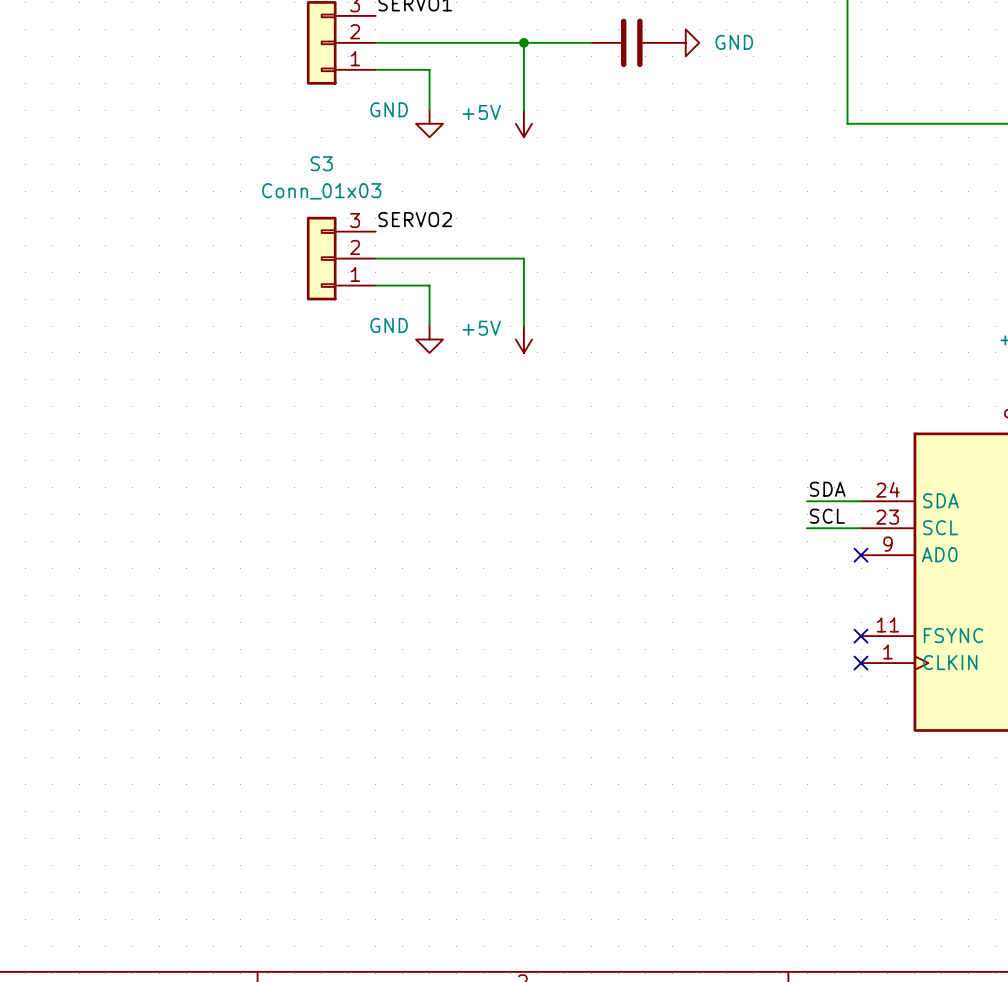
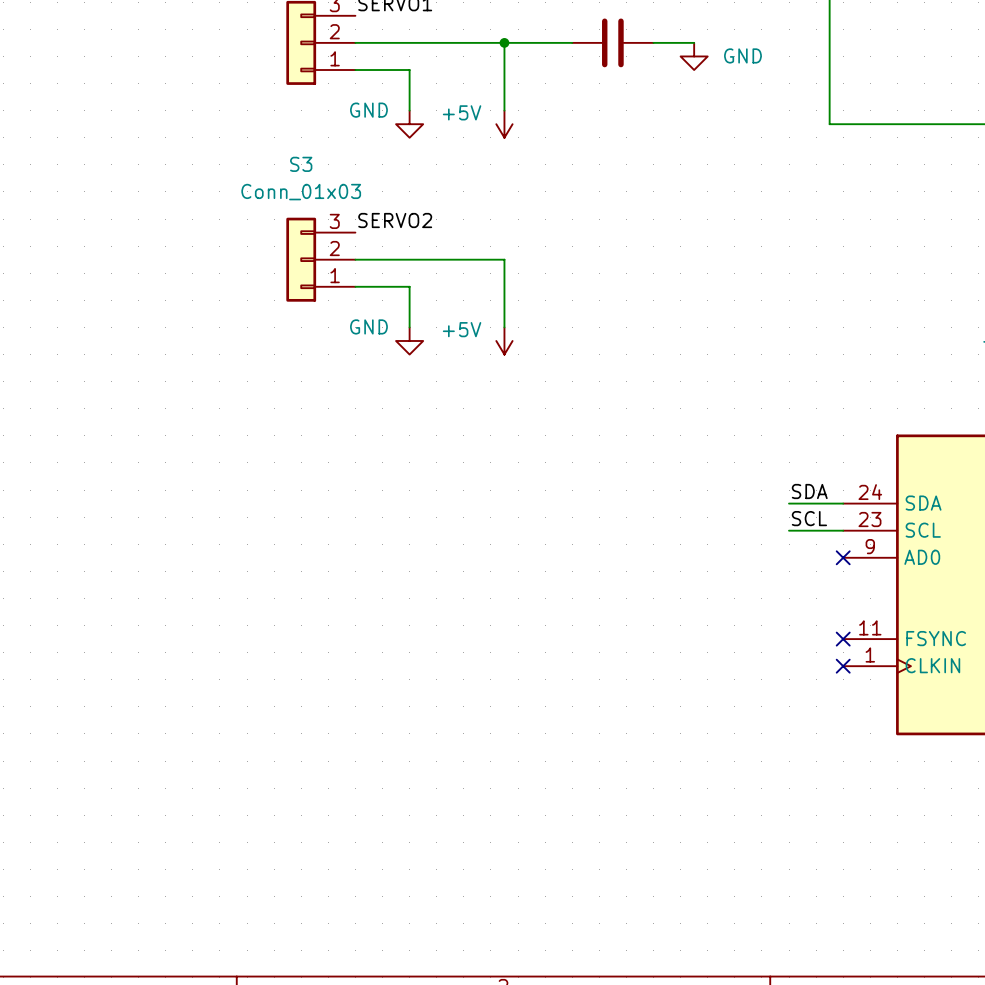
wire: none -> (653, 42) (694, 42)
power symbol rotation: 0° (685, 42) -> 90° clockwise (694, 56)
power symbol position: GND (685, 42) -> GND (694, 56)

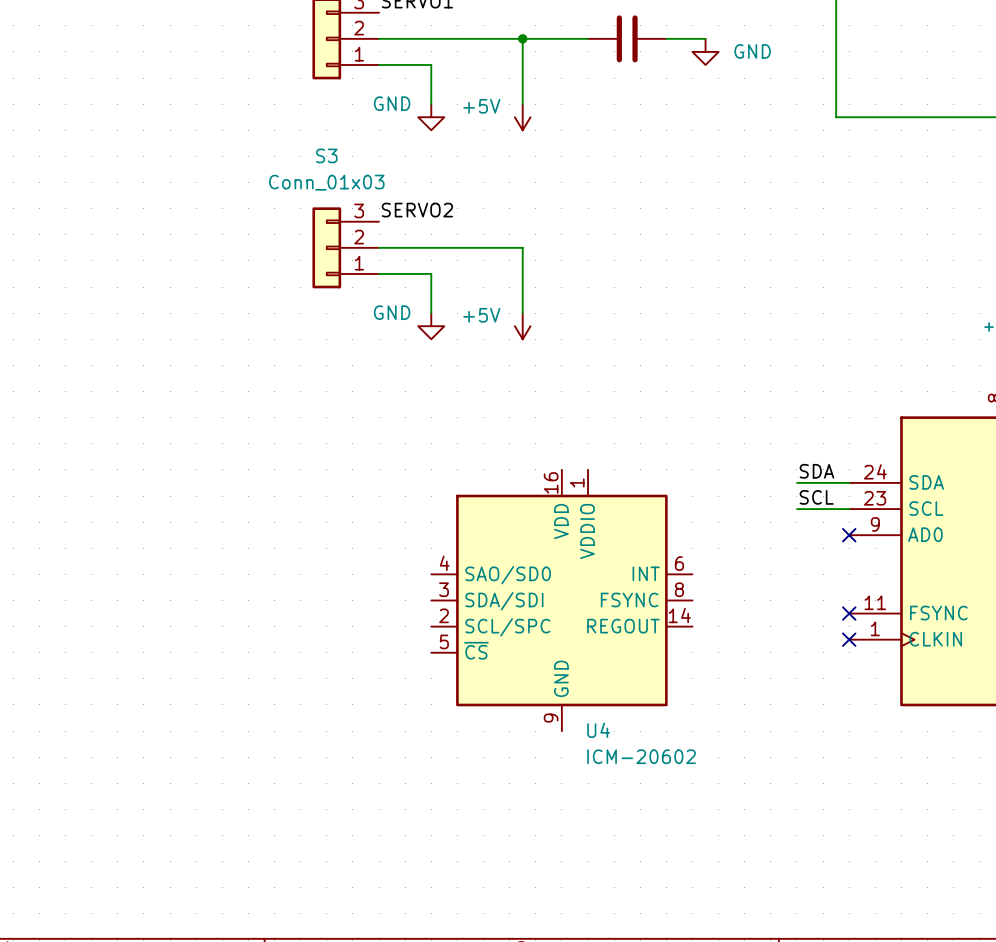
U4: none -> ICM-20602 (561, 600)

